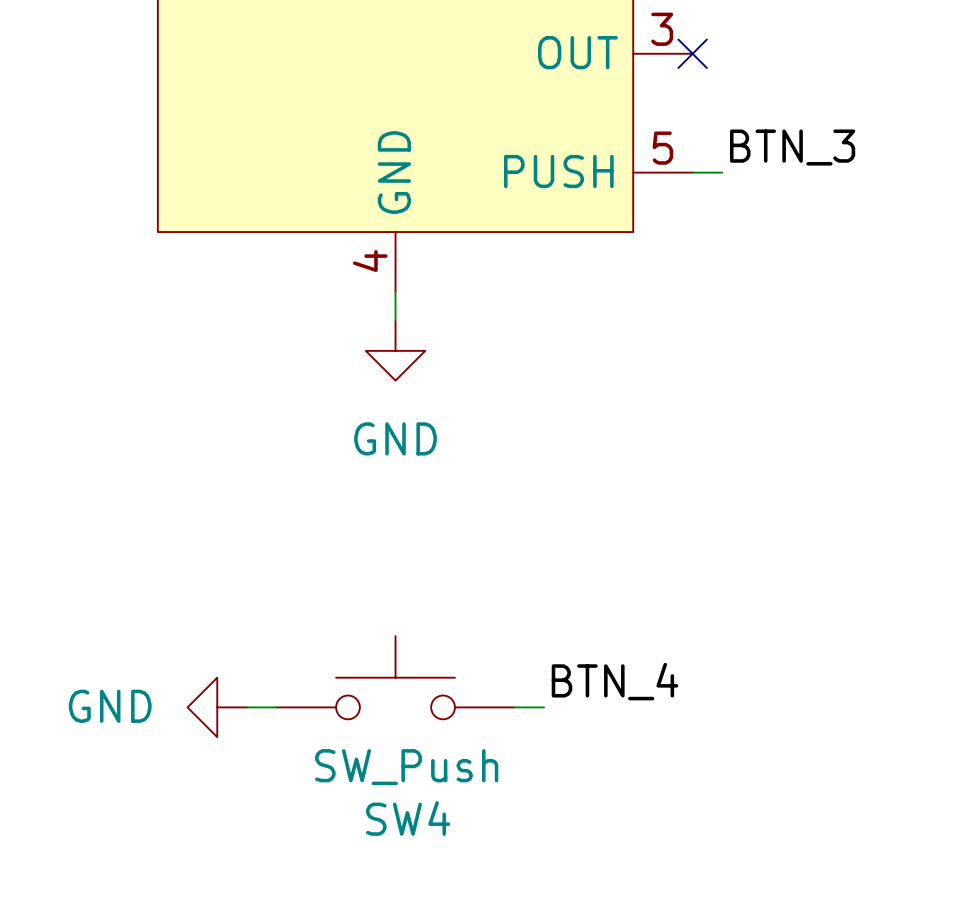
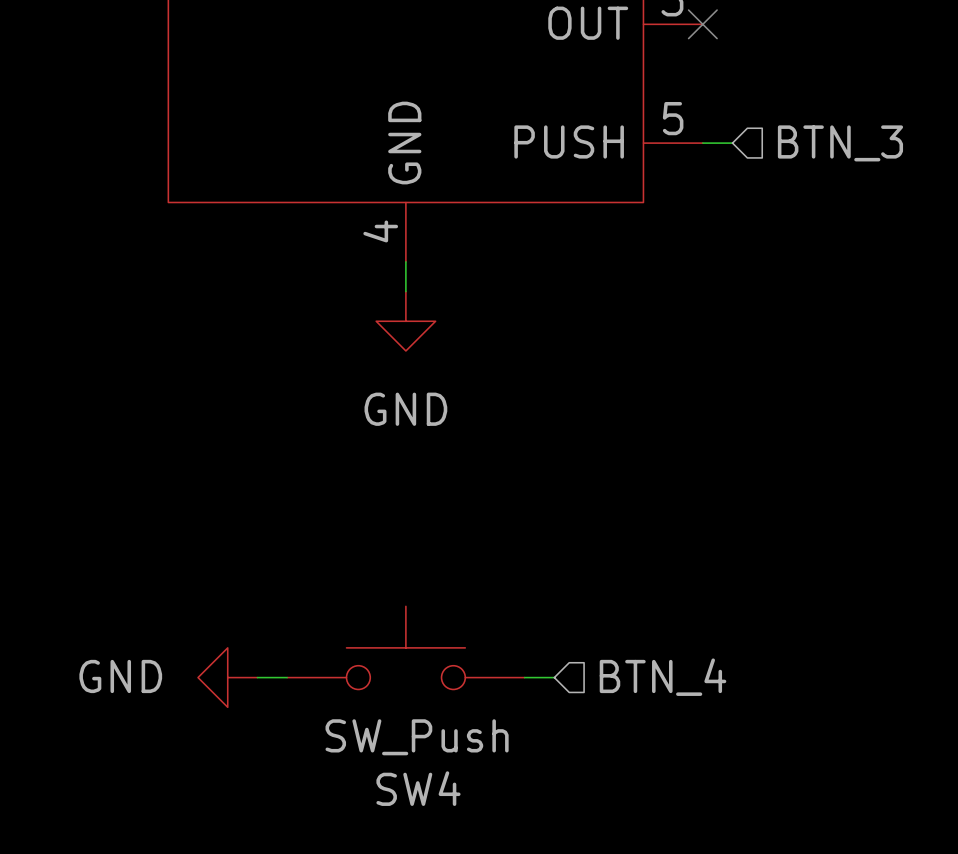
label: BTN_3 (792, 147) -> none
hierarchical label: none -> BTN_3 (840, 143)
label: BTN_4 (615, 681) -> none
hierarchical label: none -> BTN_4 (663, 677)

